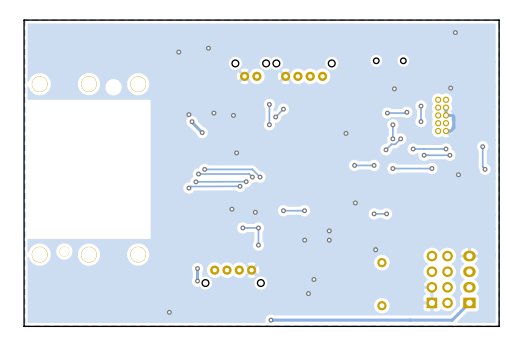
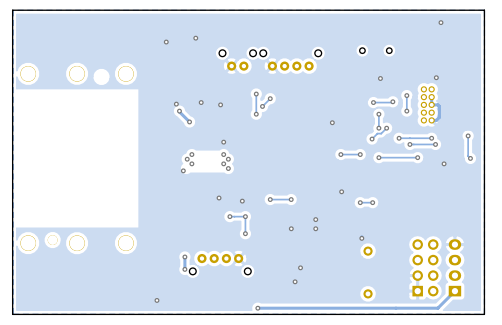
via: none -> (191, 154)
via: none -> (223, 154)
track: (204, 169) (252, 169) (260, 177) -> none
via: (204, 169) -> none
via: none -> (187, 159)
via: none -> (228, 159)
track: (198, 174) (249, 174) (252, 177) -> none
via: (198, 174) -> none
via: none -> (191, 163)
via: none -> (223, 163)
via: (252, 177) -> none
via: (260, 177) -> none
via: none -> (228, 168)
track: (246, 181) (195, 181) -> none
via: (246, 181) -> none
track: (240, 186) (188, 188) -> none
via: (240, 186) -> none
via: (188, 188) -> none

